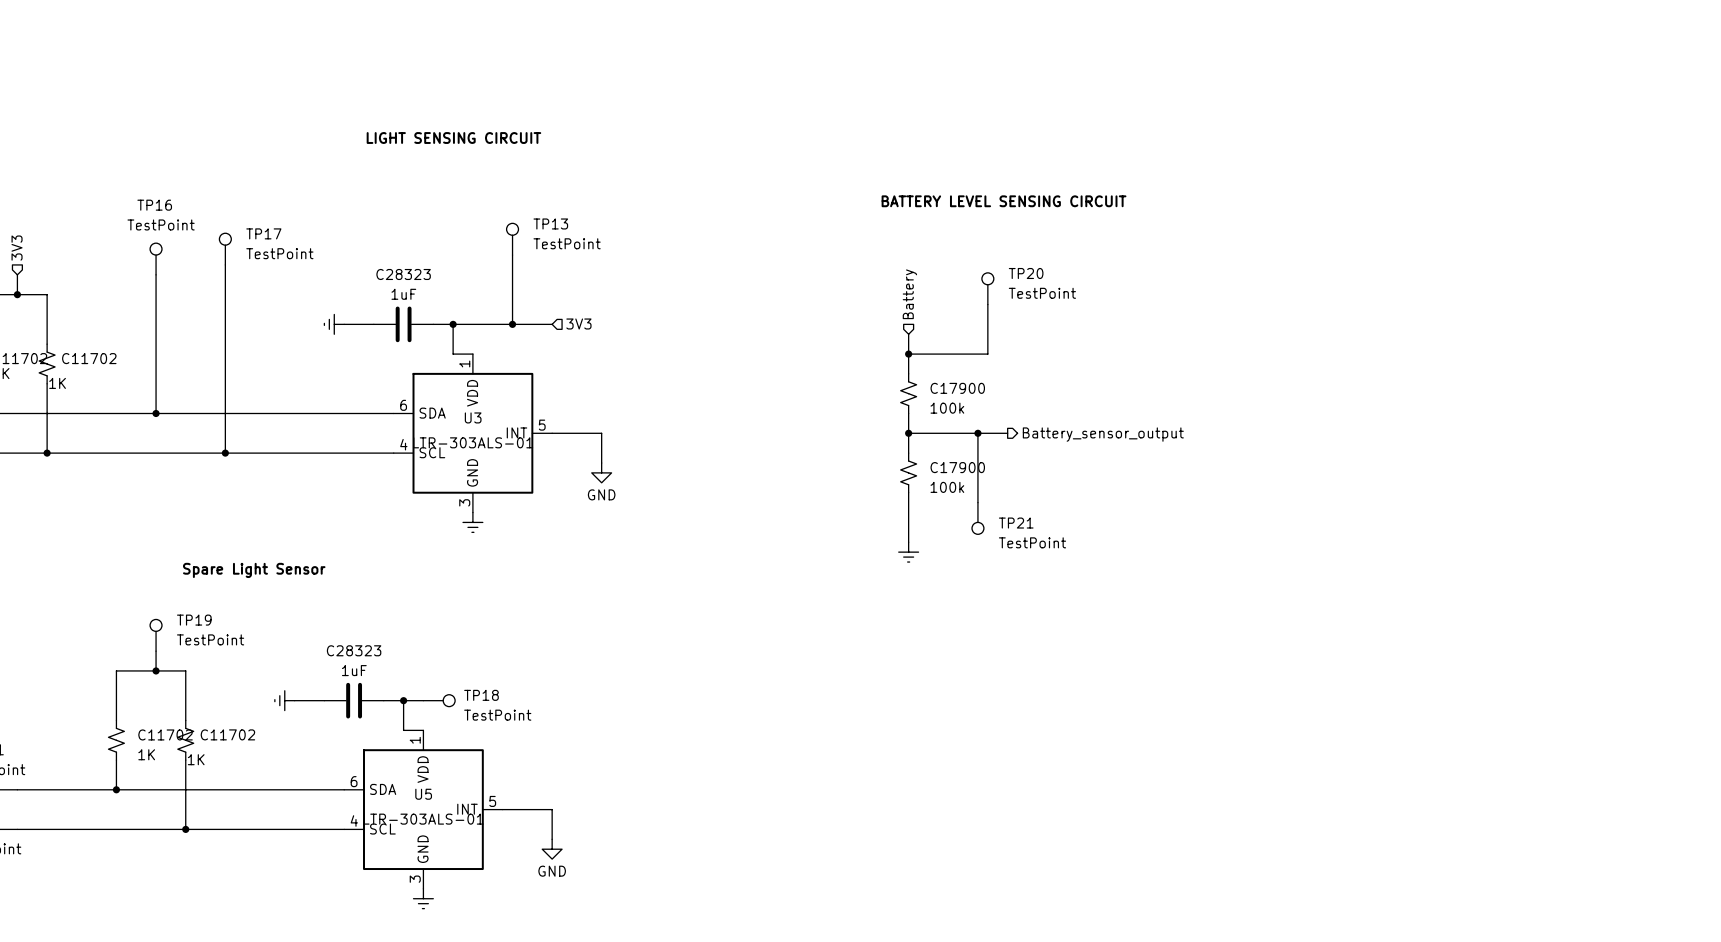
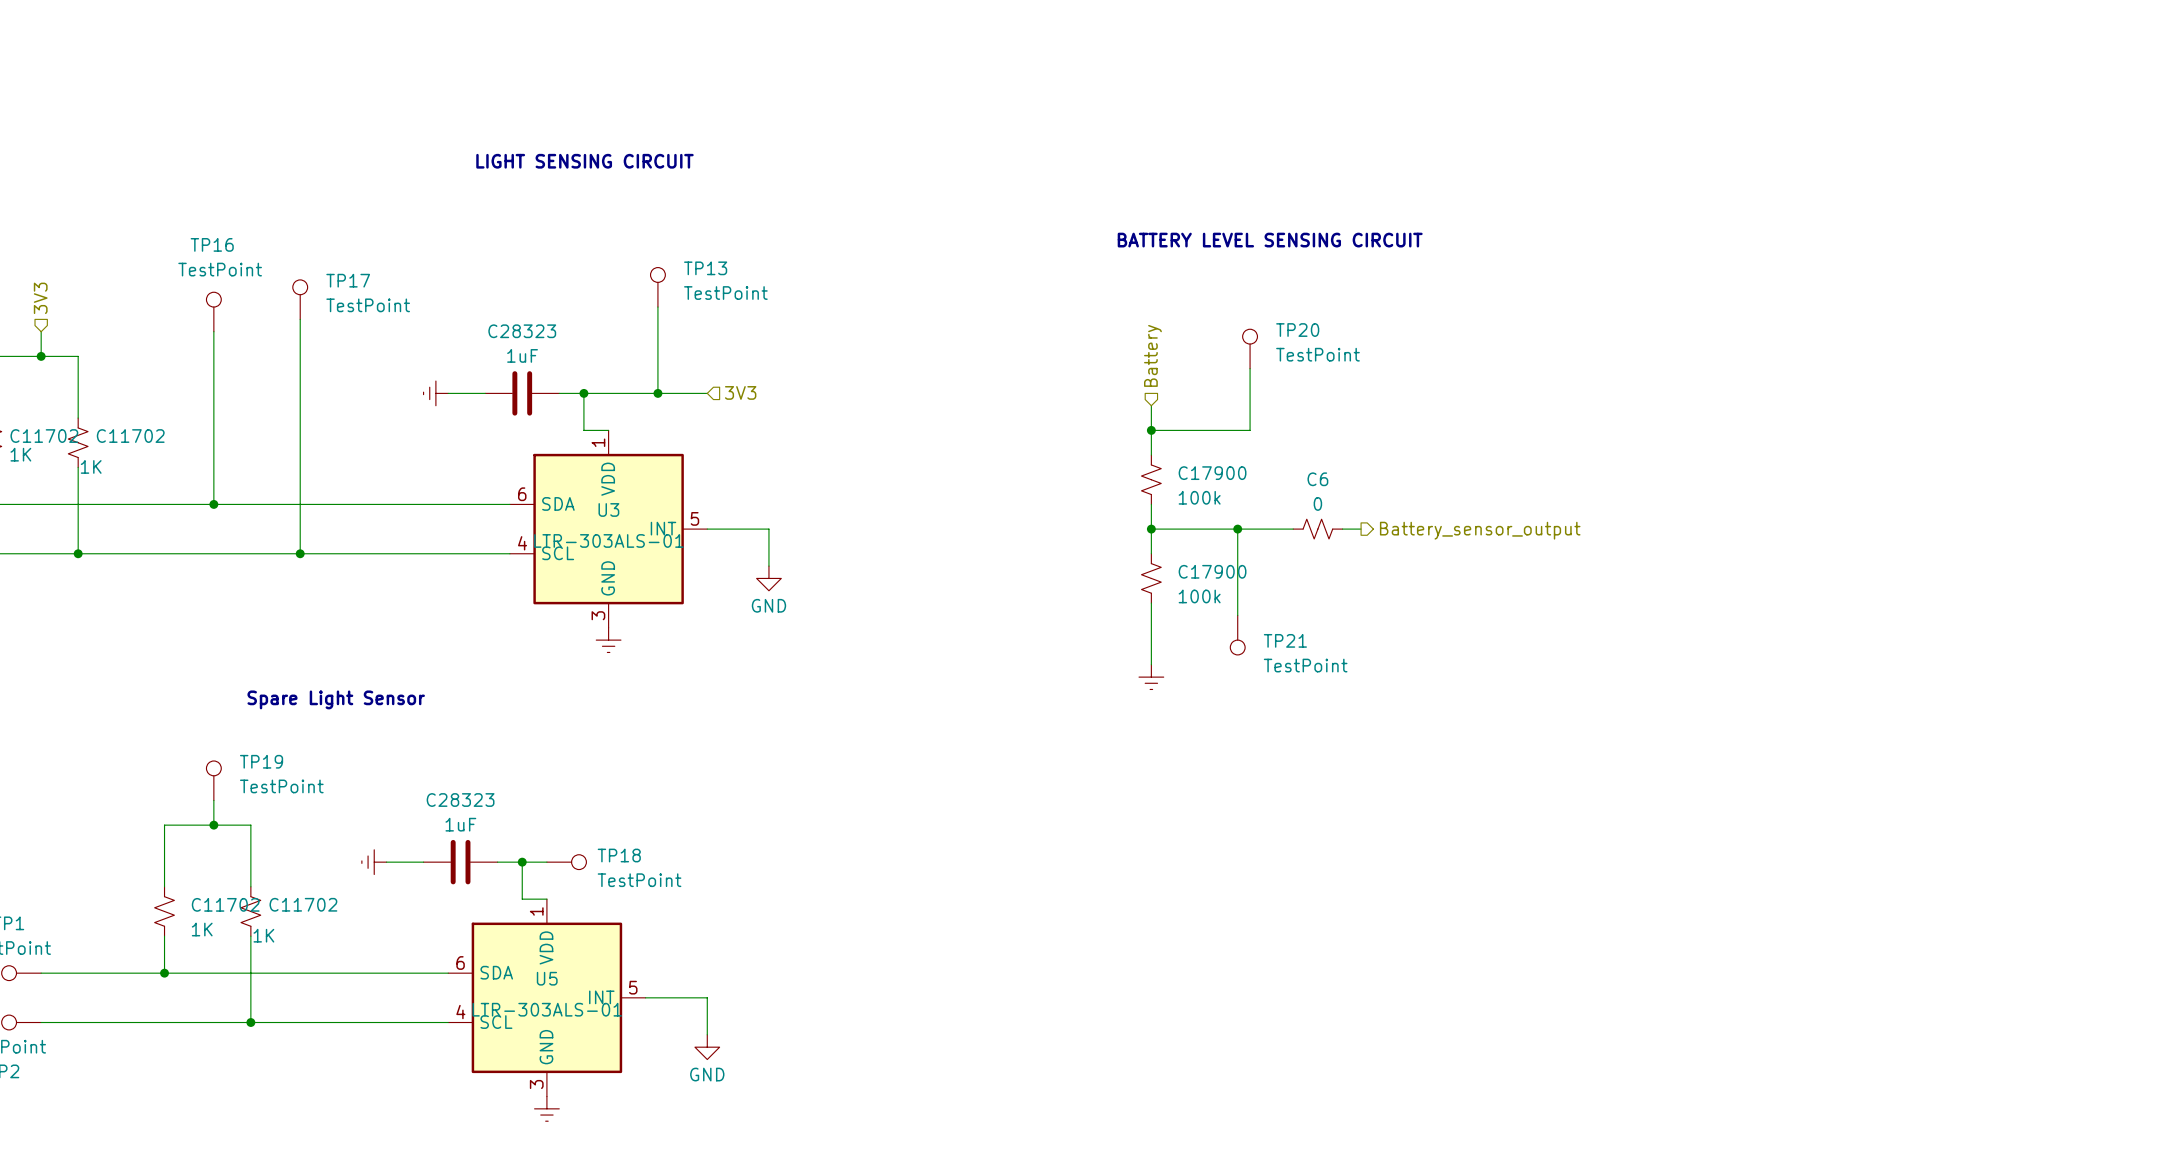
wire: none -> (1274, 529) (1293, 529)
C6: none -> 0 (1317, 529)
wire: none -> (1342, 529) (1361, 529)
hierarchical label position: Battery_sensor_output (1103, 434) -> Battery_sensor_output (1480, 530)

